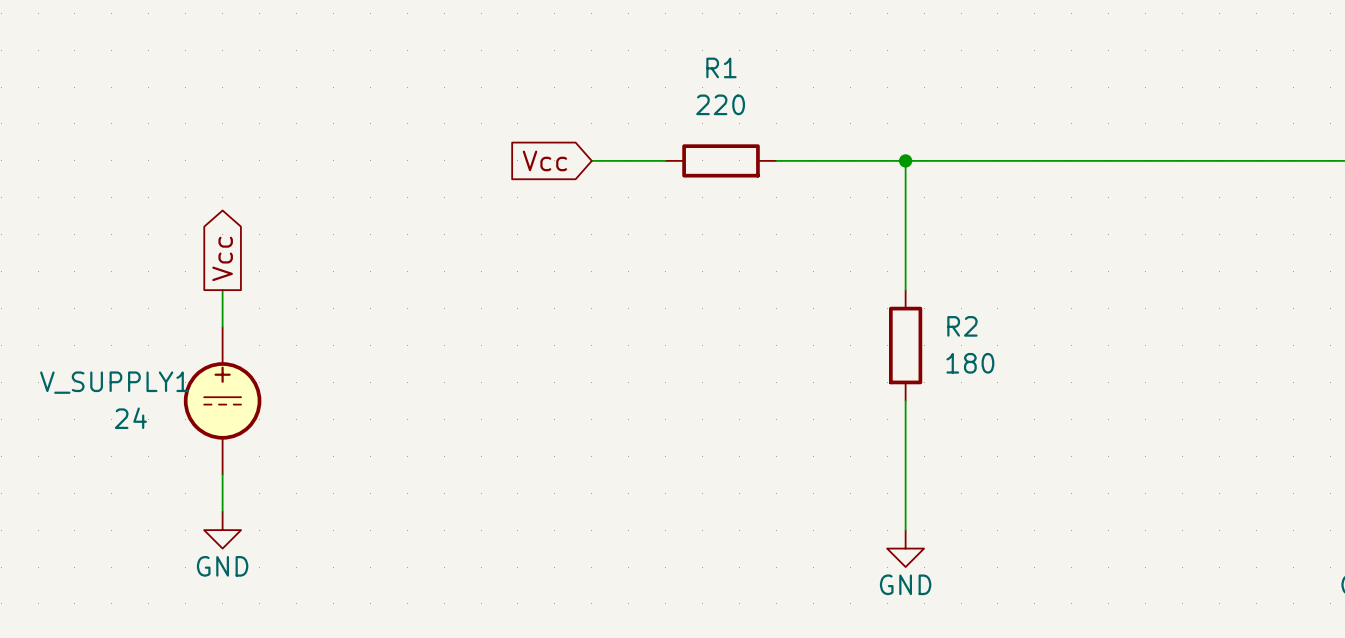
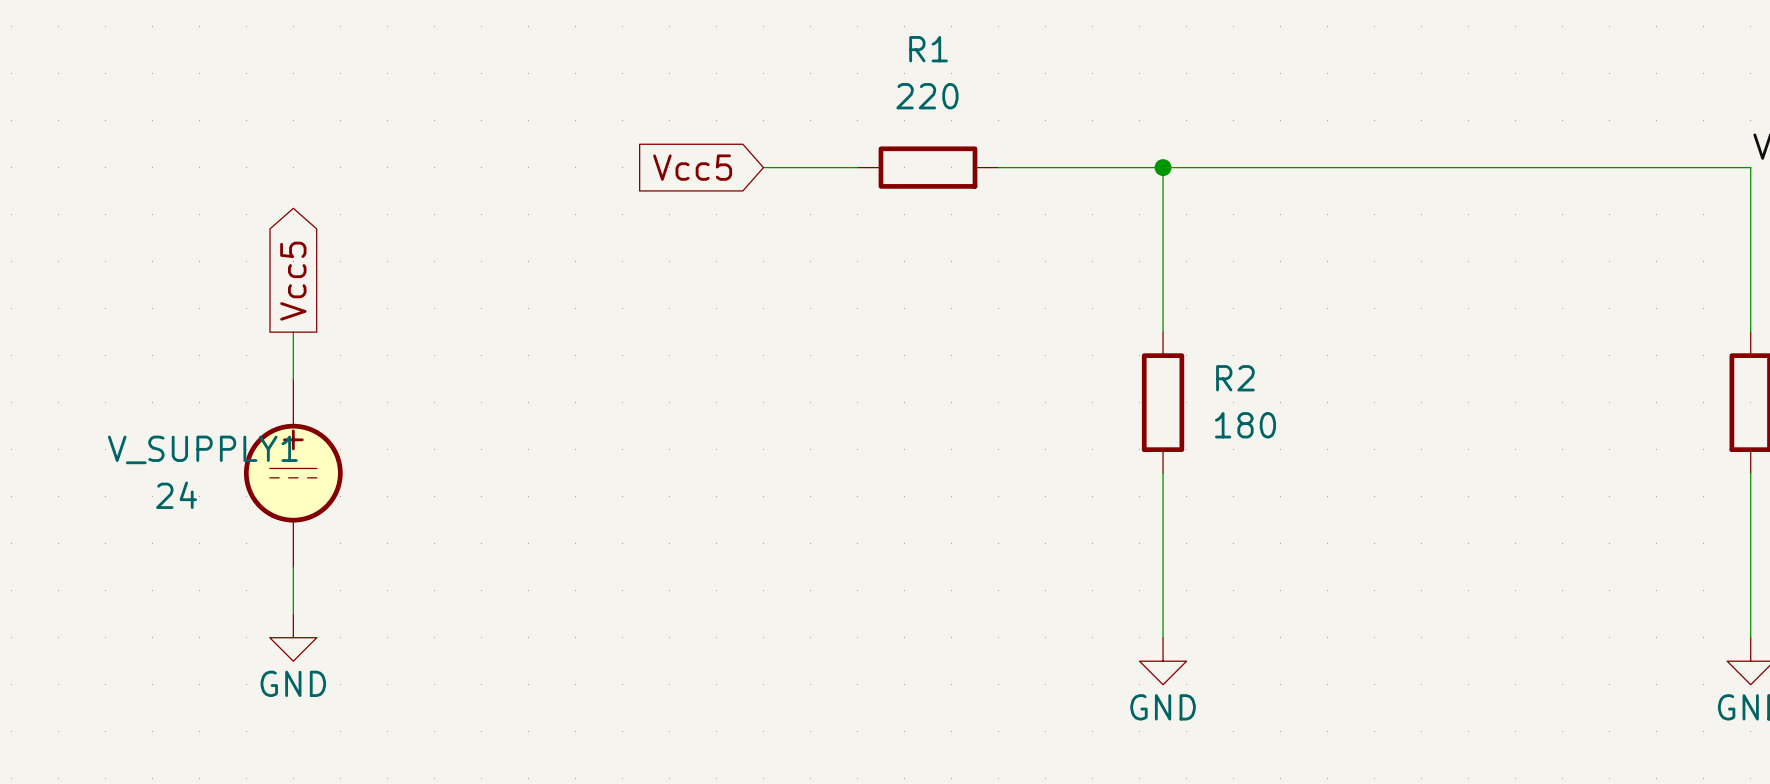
global label: Vcc (544, 160) -> Vcc5 (692, 167)
global label: Vcc (222, 258) -> Vcc5 (293, 281)
V_SUPPLY1 name position: V_SUPPLY1 (114, 382) -> V_SUPPLY1 (202, 449)

